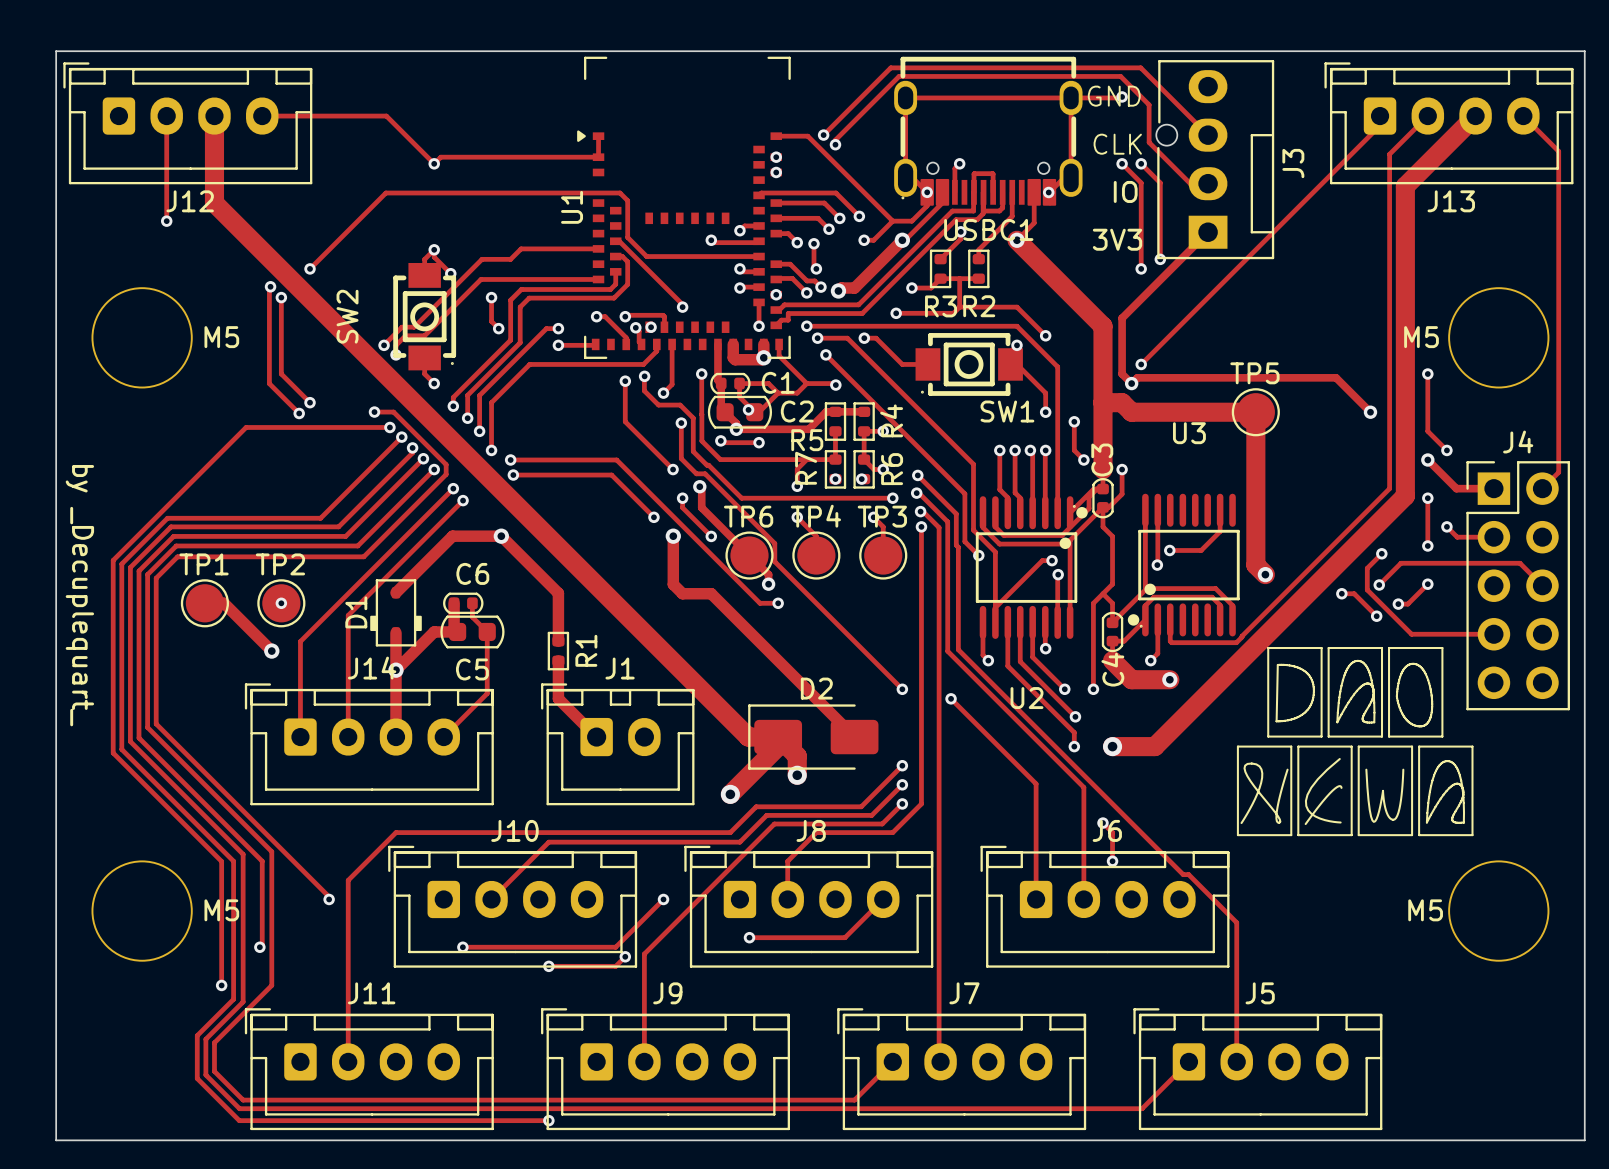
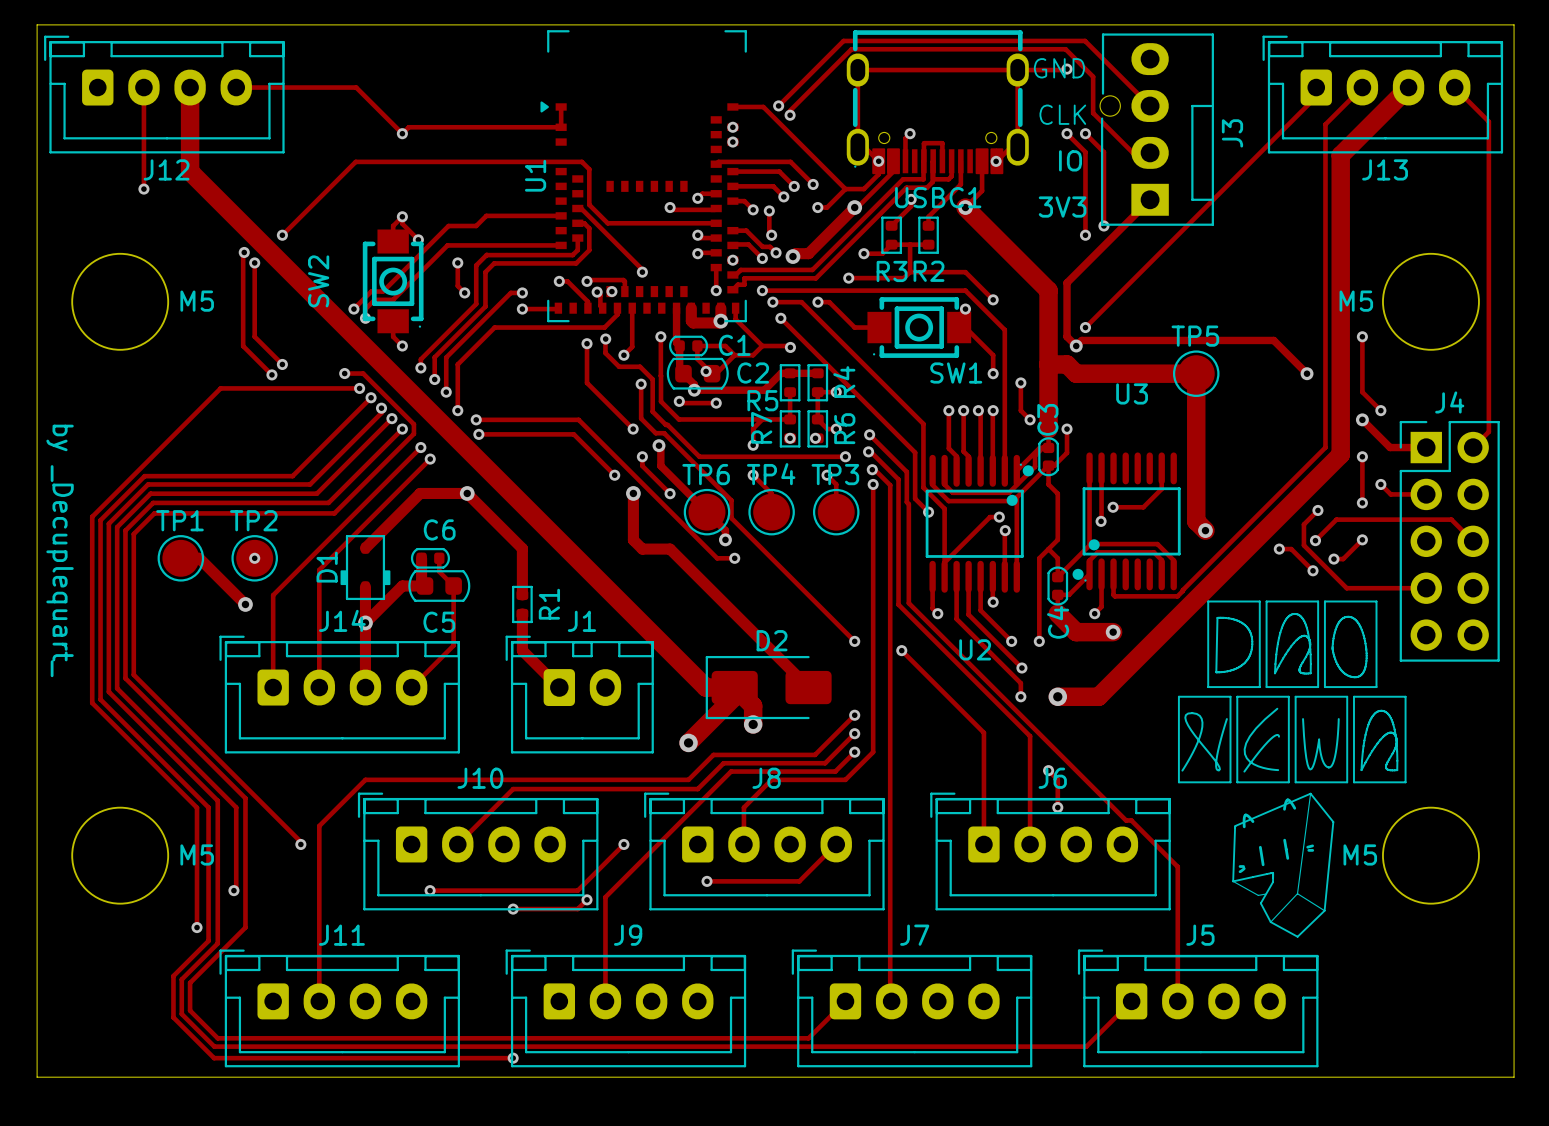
line: none -> (1310, 793) (1235, 825) (1233, 881)
line: none -> (1310, 793) (1333, 822) (1324, 910)
line: none -> (1310, 793) (1297, 893)
line: none -> (1294, 808) (1287, 799) (1284, 809)
line: none -> (1252, 821) (1245, 815) (1244, 826)
line: none -> (1284, 840) (1287, 858)
line: none -> (1312, 845) (1307, 847)
line: none -> (1260, 847) (1263, 864)
line: none -> (1308, 850) (1312, 850)
line: none -> (1240, 866) (1243, 866)
line: none -> (1244, 868) (1240, 871)
line: none -> (1273, 872) (1233, 881)
line: none -> (1273, 873) (1272, 882) (1260, 903) (1270, 922)
line: none -> (1233, 881) (1258, 895) (1266, 894)
line: none -> (1297, 893) (1270, 922)
line: none -> (1297, 893) (1324, 910)
line: none -> (1324, 910) (1297, 936) (1270, 922)

